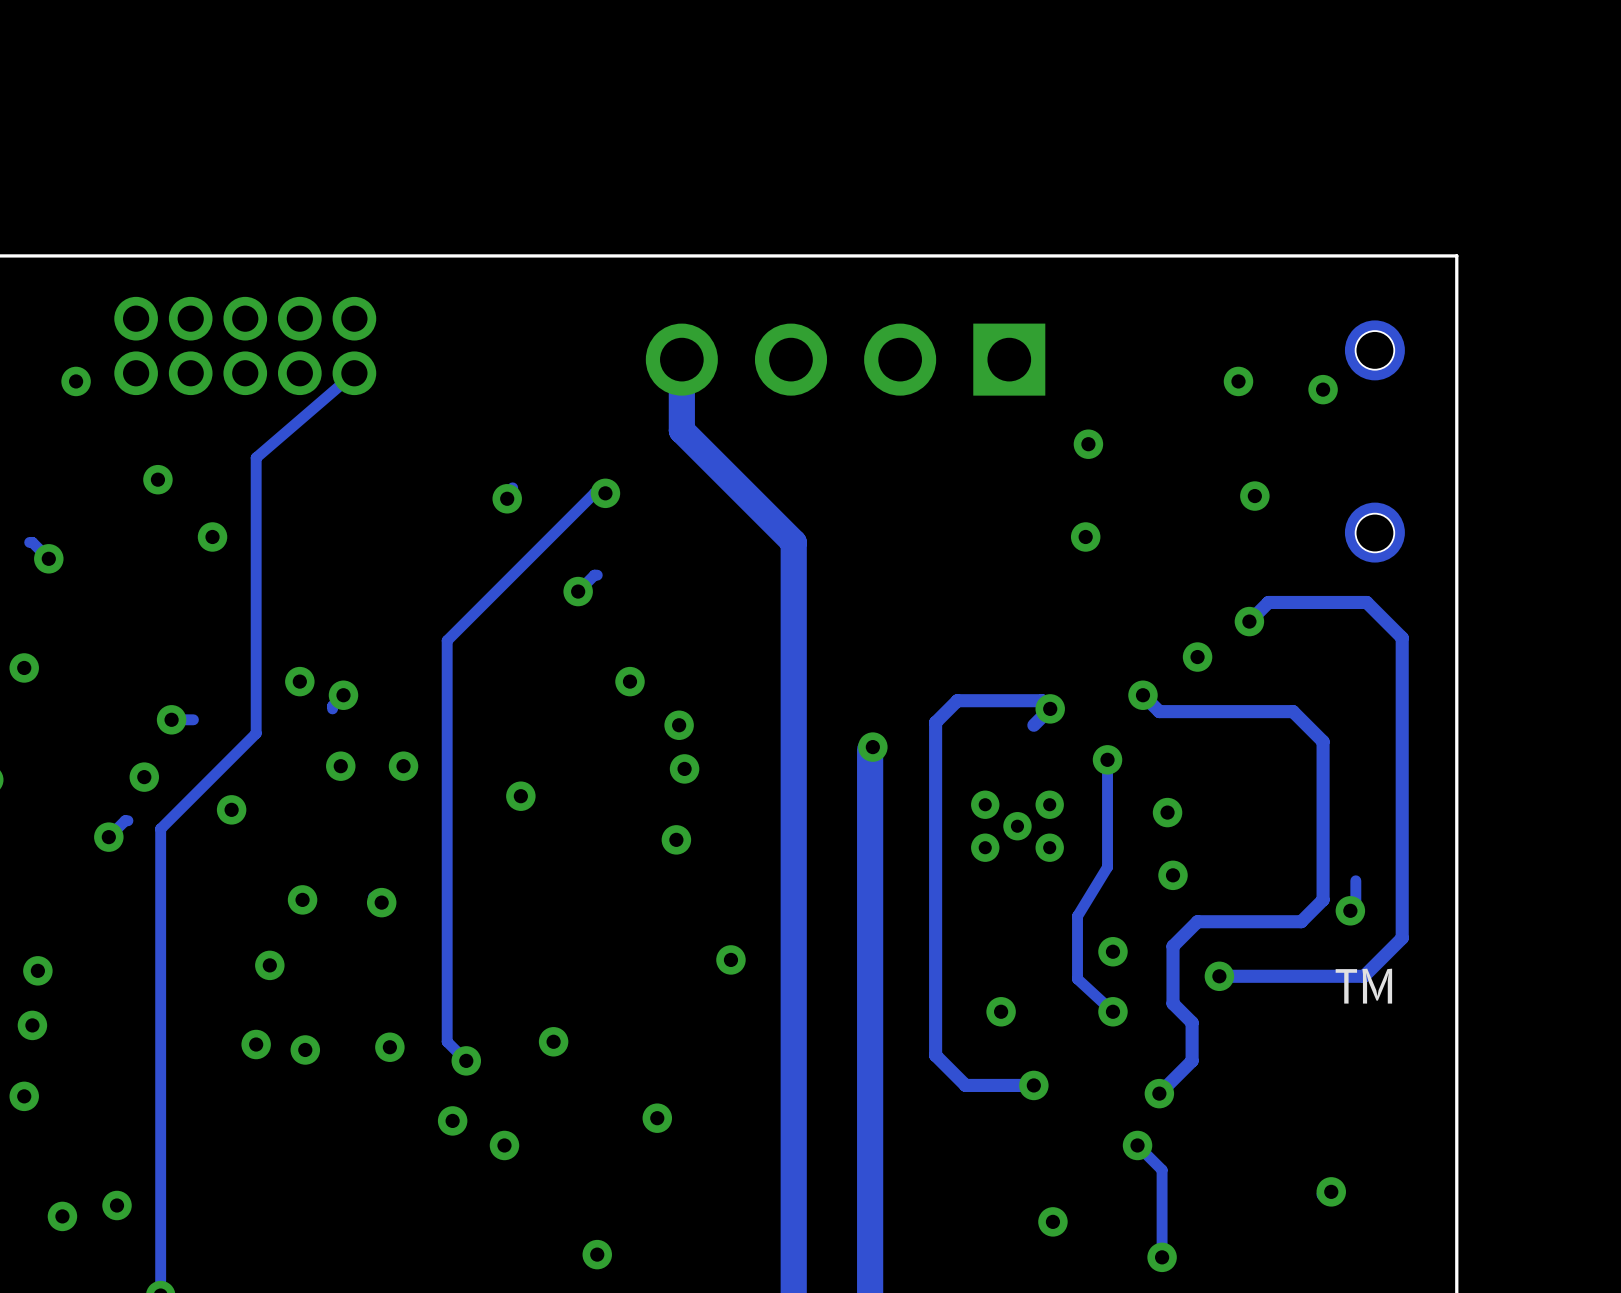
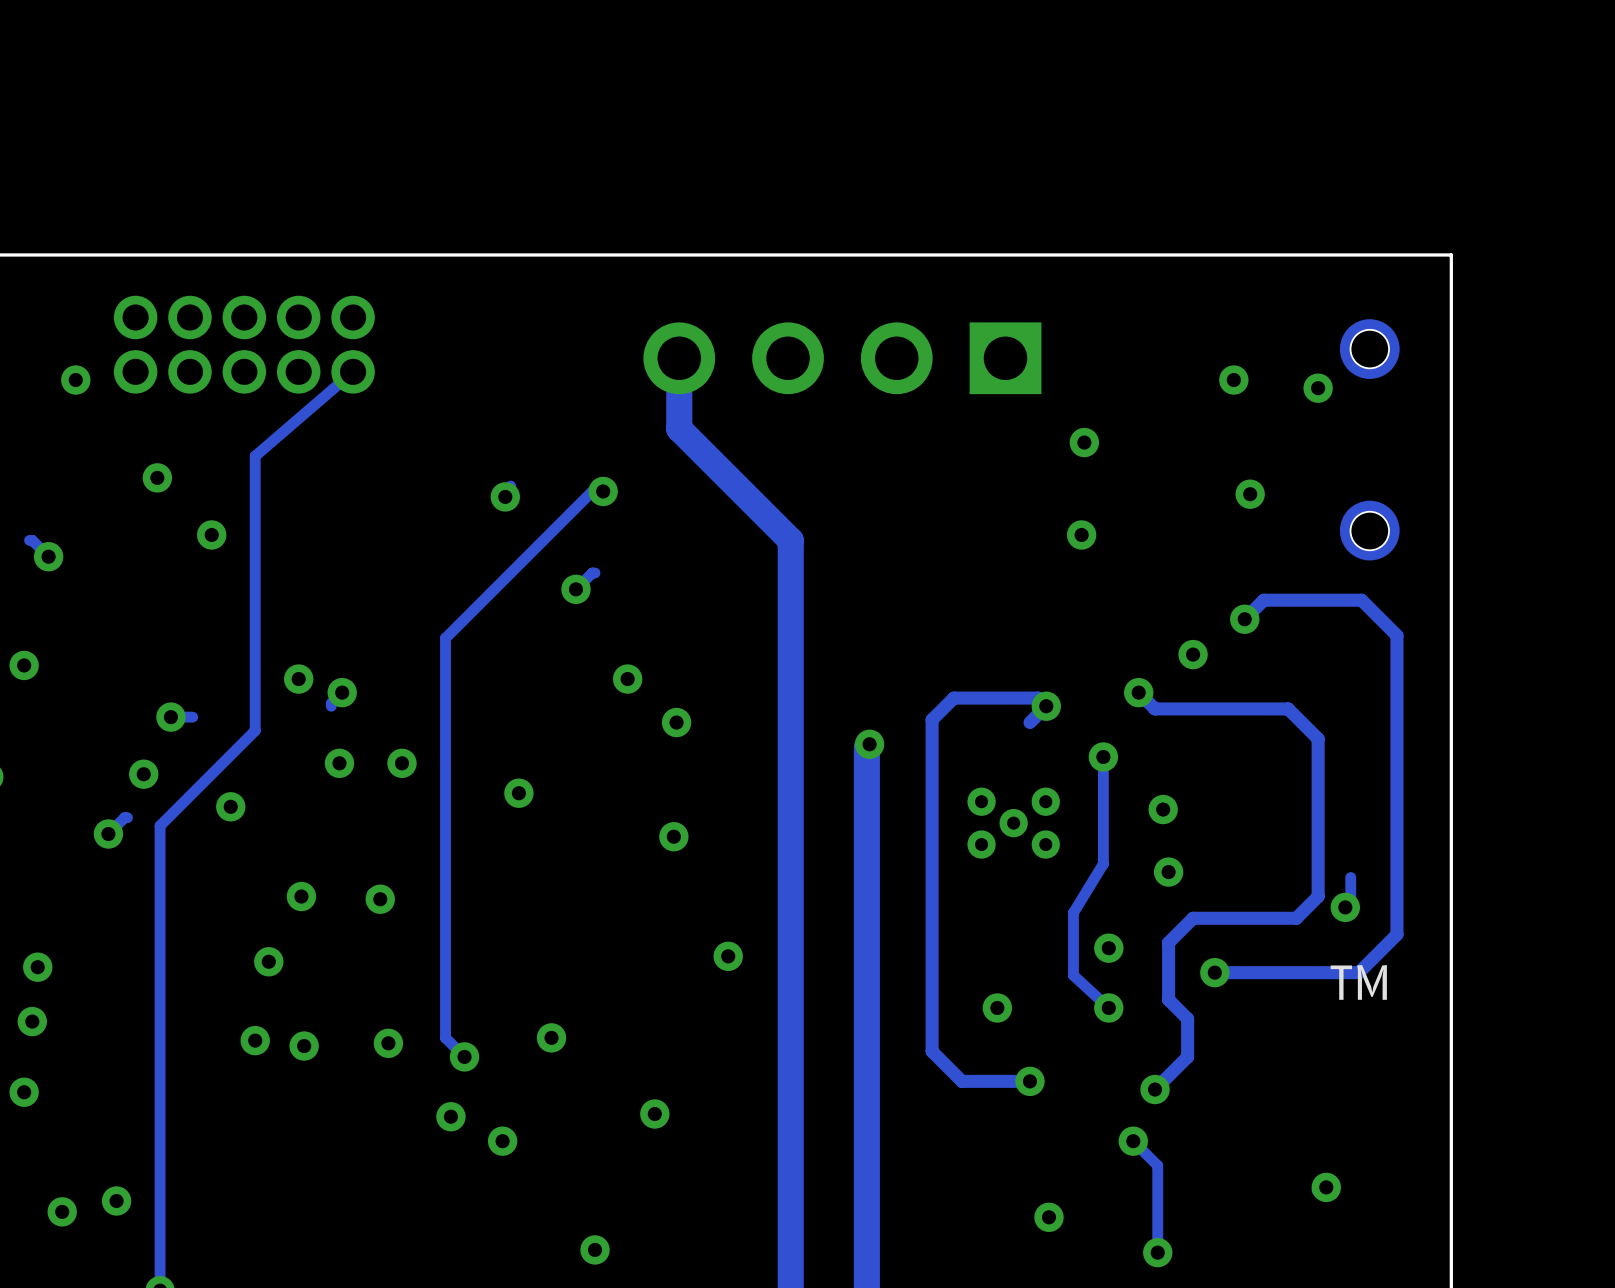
via: (684, 768) -> none

